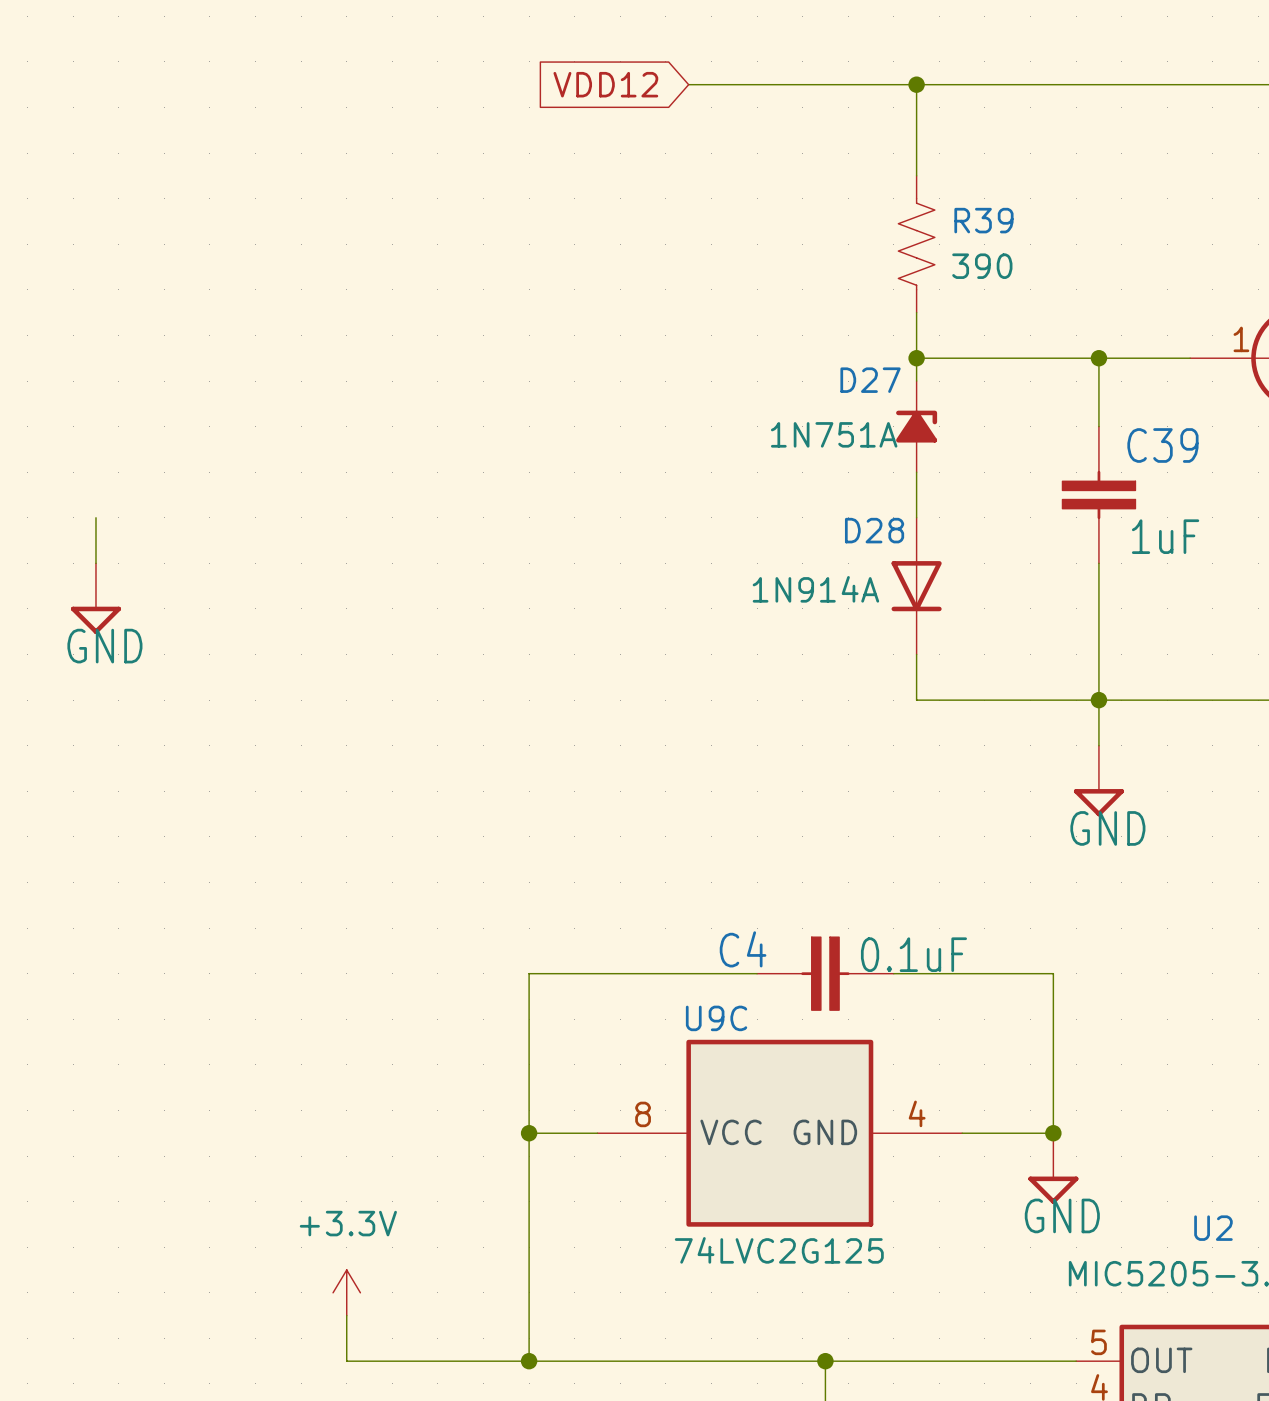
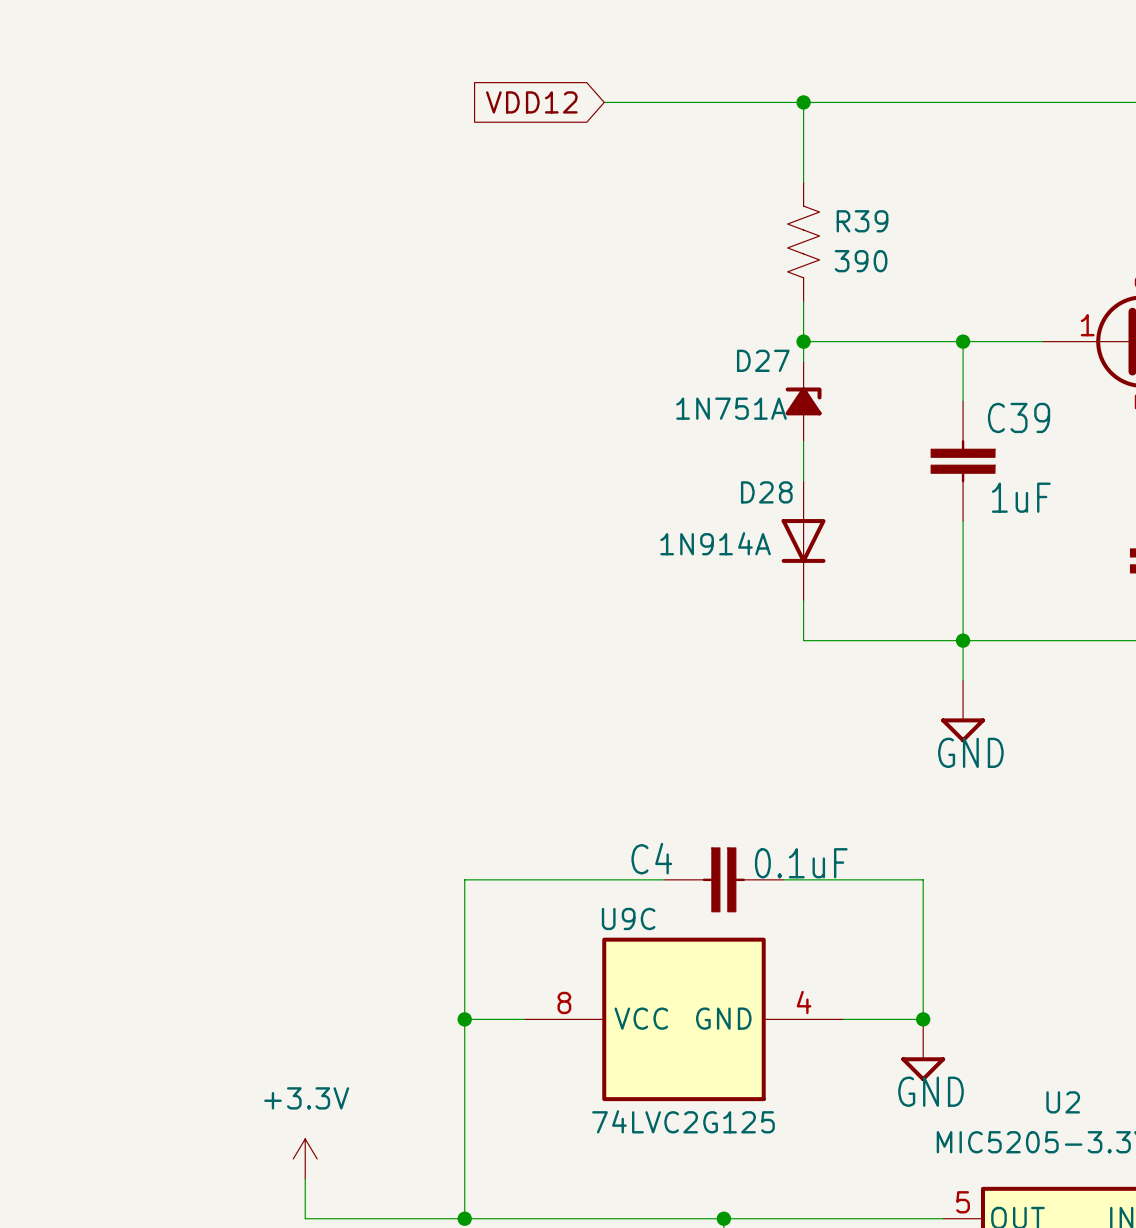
wire: (95, 517) (95, 563) -> none
power symbol: GND (95, 598) -> none

